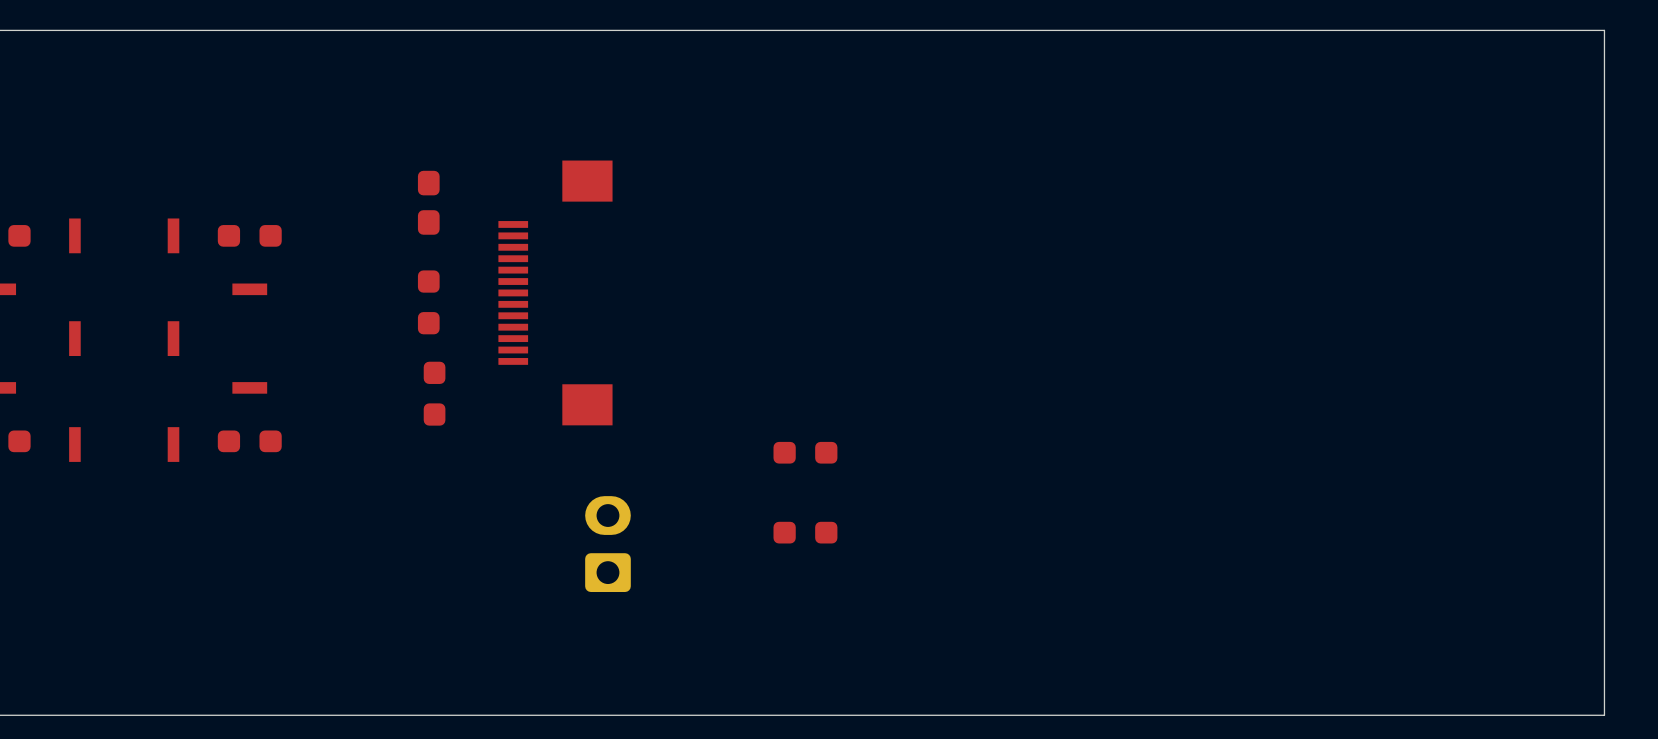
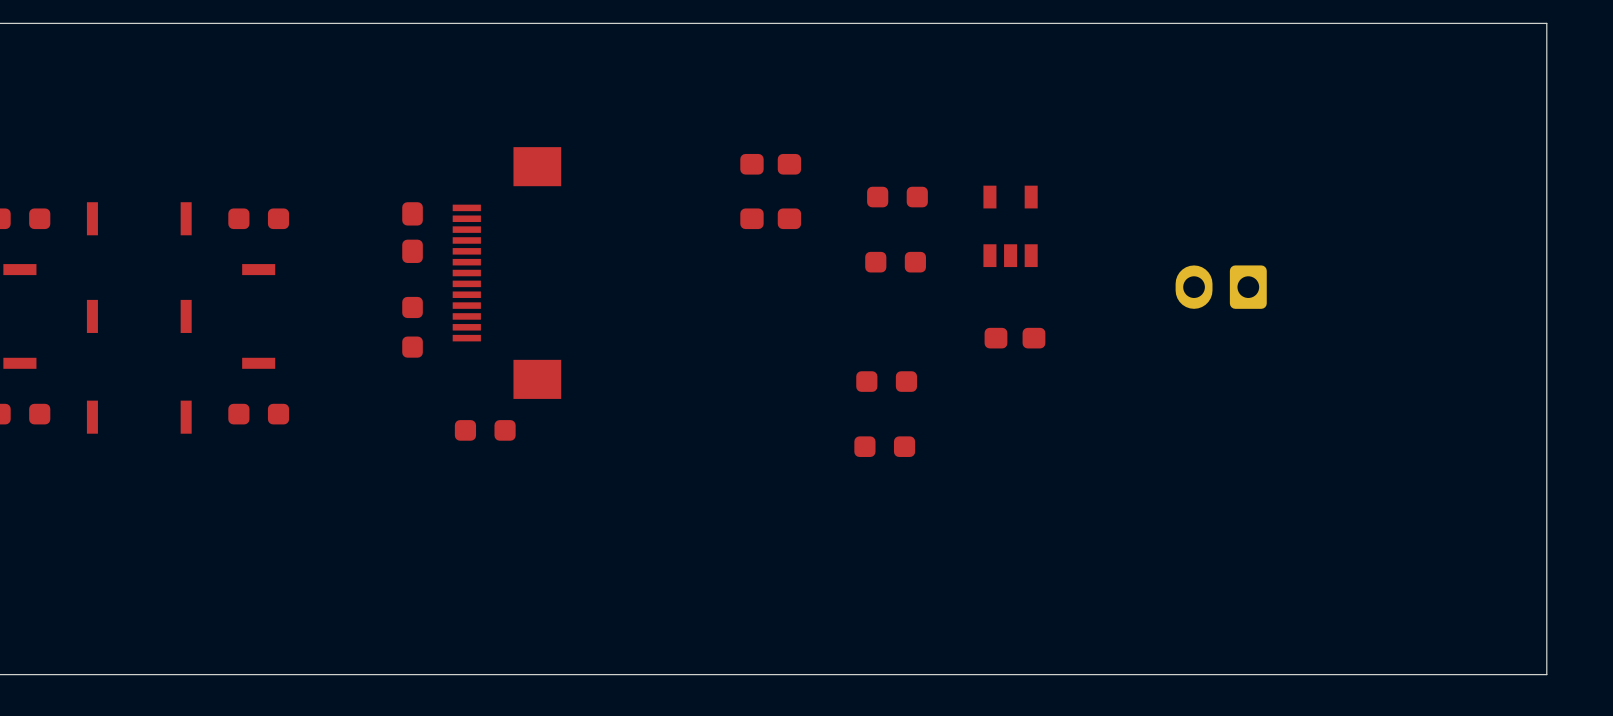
part: none -> (770, 164)
part position: (428, 202) -> (412, 232)
part: none -> (897, 197)
part: none -> (770, 218)
part: none -> (1010, 226)
part: none -> (895, 262)
part position: (555, 292) -> (506, 273)
part: (428, 302) -> none
part: none -> (1221, 287)
part: none -> (412, 327)
part: none -> (1014, 338)
part: (434, 393) -> none
part: none -> (886, 381)
part: (805, 452) -> none
part: none -> (485, 430)
part: none -> (884, 446)
part: (805, 532) -> none
part: (607, 544) -> none

